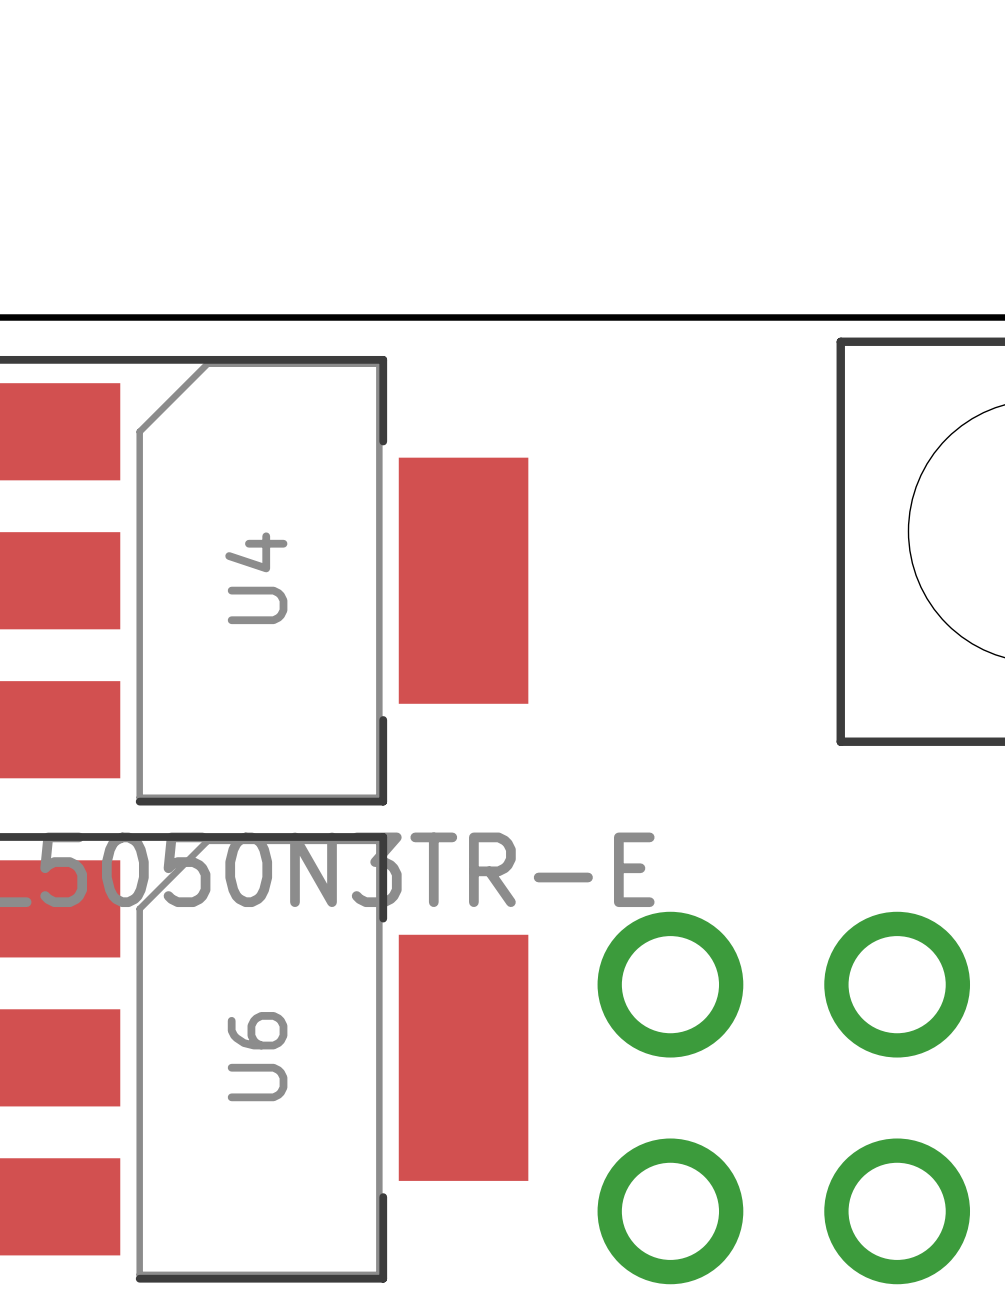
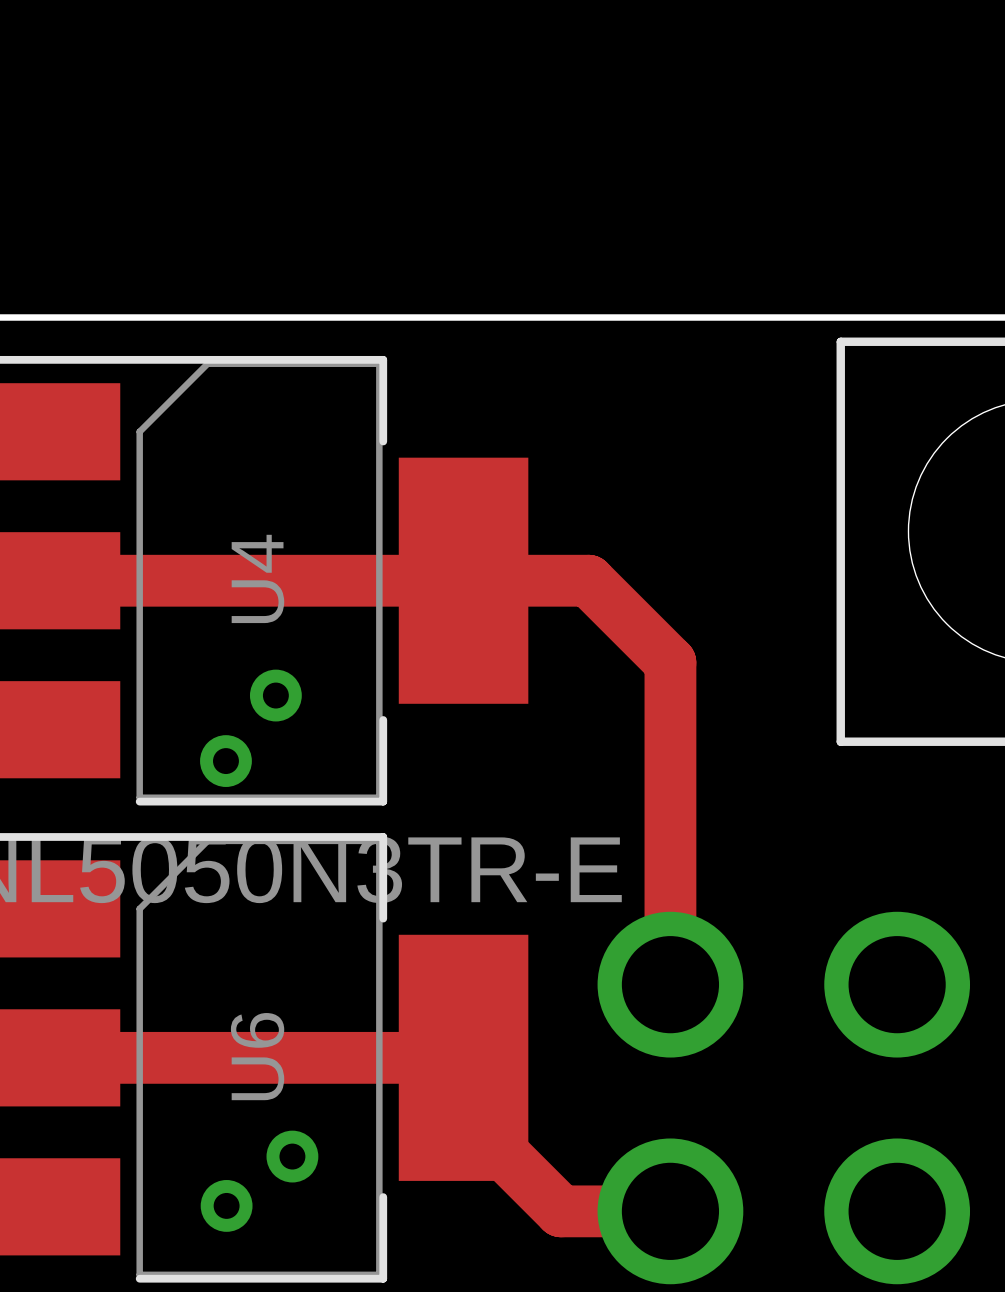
top track: none -> (55, 580) (588, 580) (670, 662) (670, 984)
via: none -> (275, 695)
via: none -> (225, 761)
top track: none -> (55, 1057) (463, 1057) (463, 1113) (561, 1211) (670, 1211)
via: none -> (292, 1156)
via: none -> (226, 1205)

